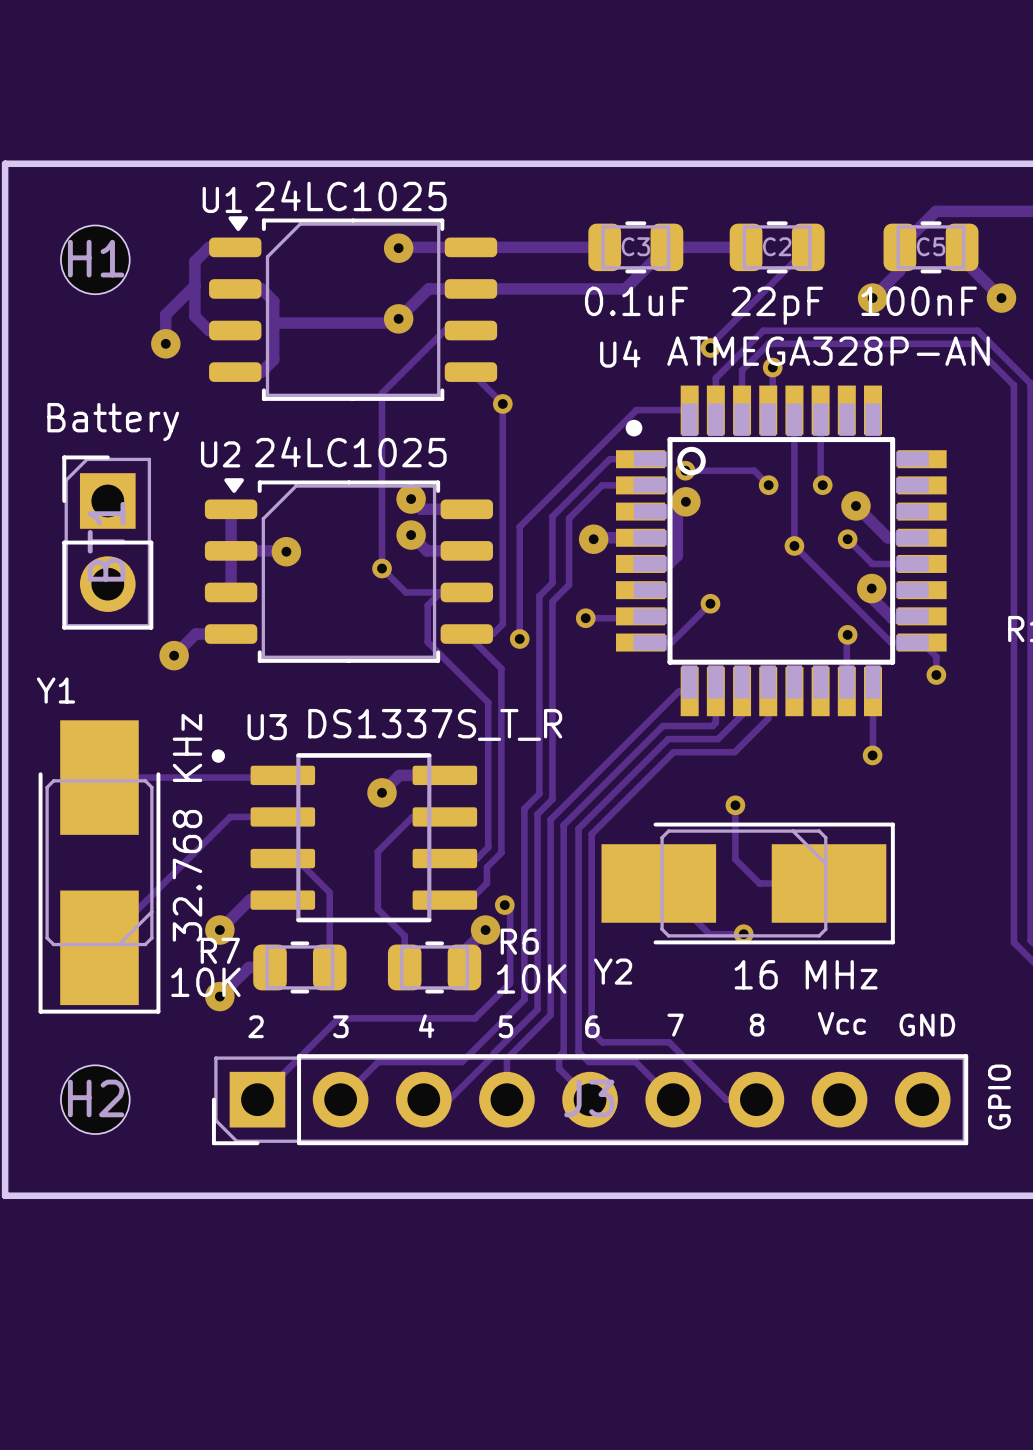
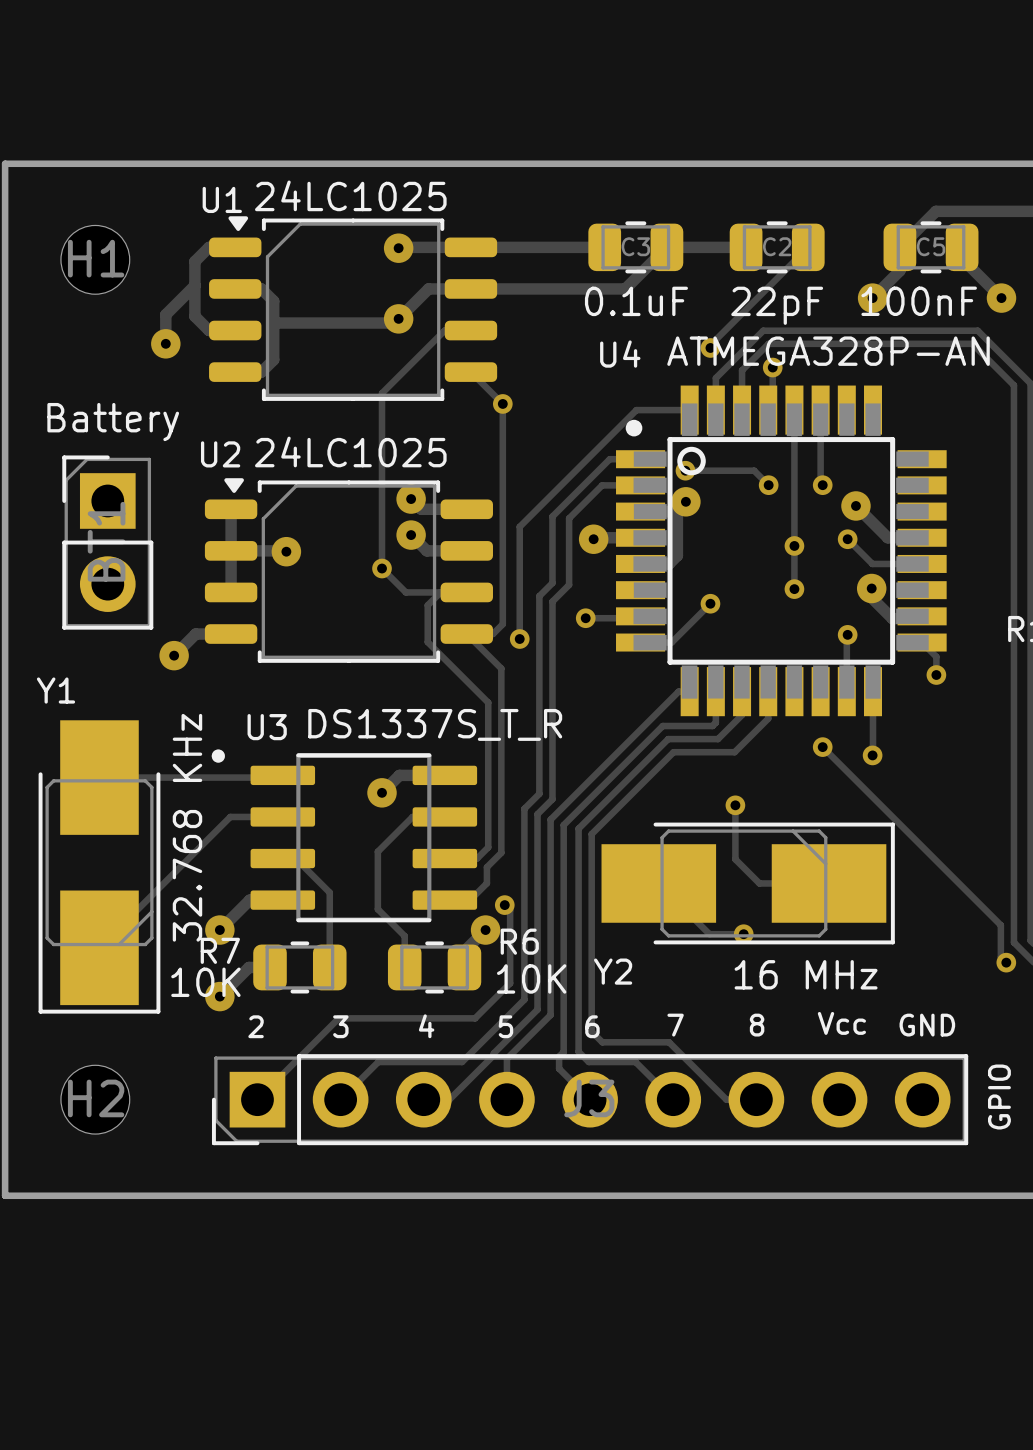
track: (794, 545) (891, 642) (922, 642) -> (794, 545) (794, 589)
via: none -> (794, 589)
track: none -> (822, 747) (1000, 925) (1000, 957) (1006, 962)
via: none -> (822, 747)
via: none -> (1006, 962)

